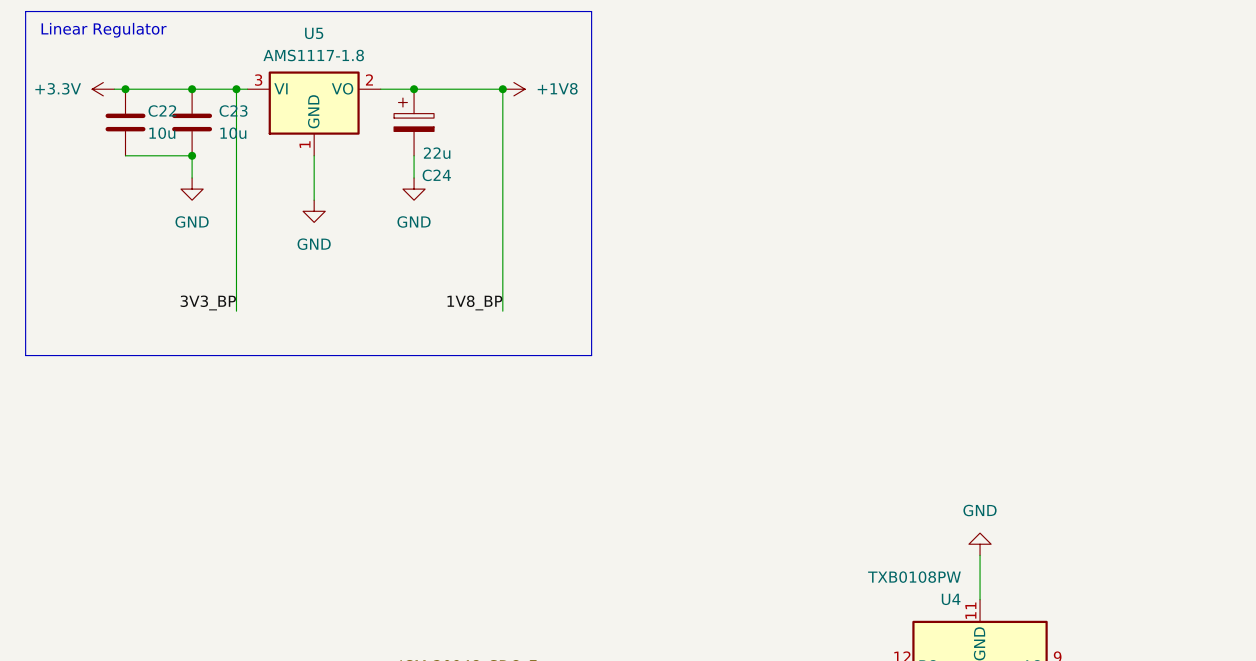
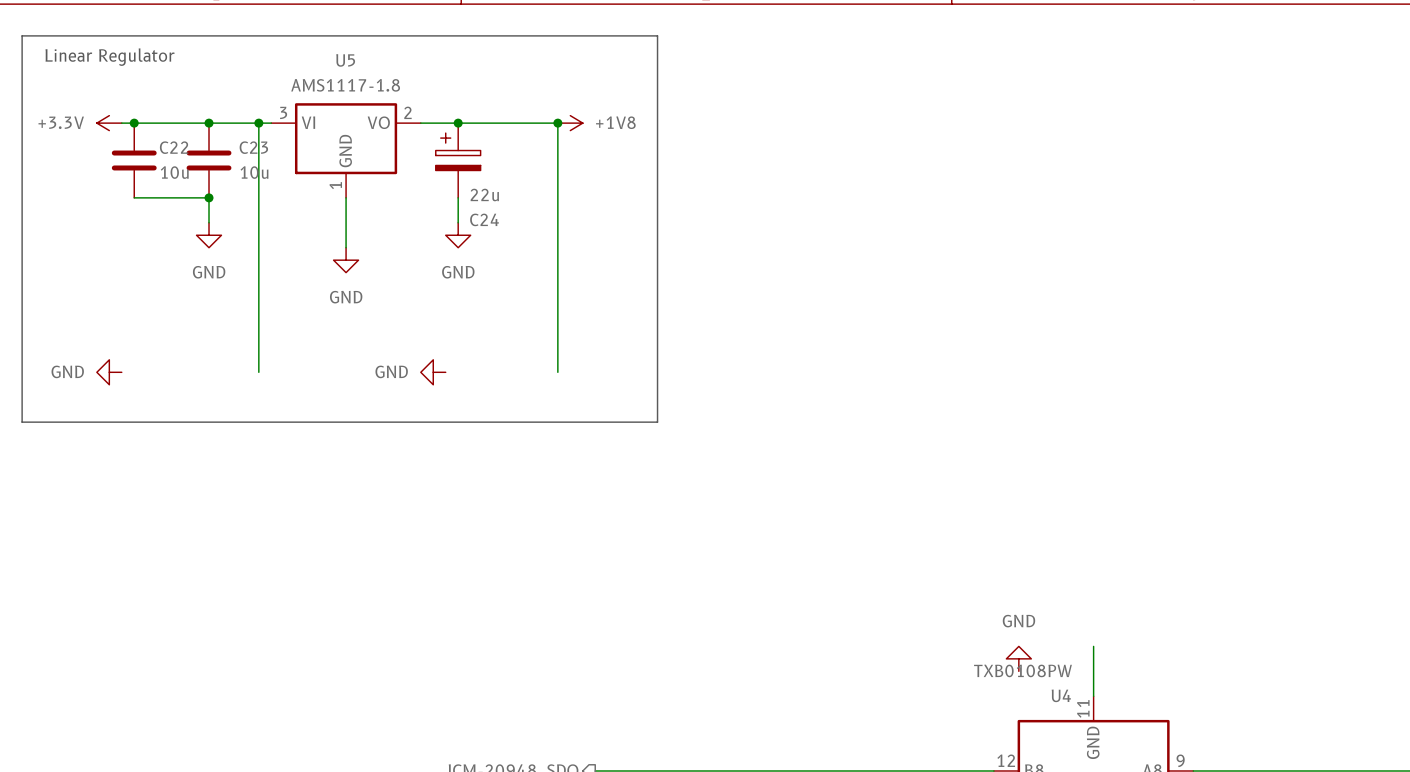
label: 3V3_BP (208, 302) -> none
label: 1V8_BP (474, 302) -> none
power symbol: none -> GND (109, 372)
power symbol: none -> GND (433, 372)
power symbol position: GND (980, 544) -> GND (1018, 658)

